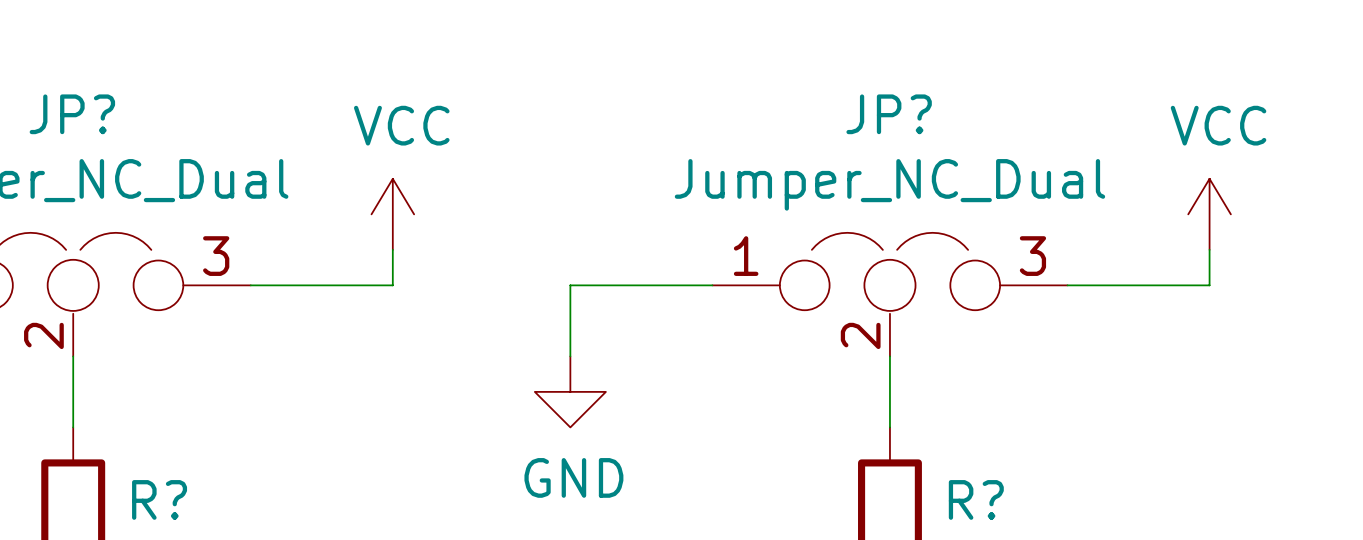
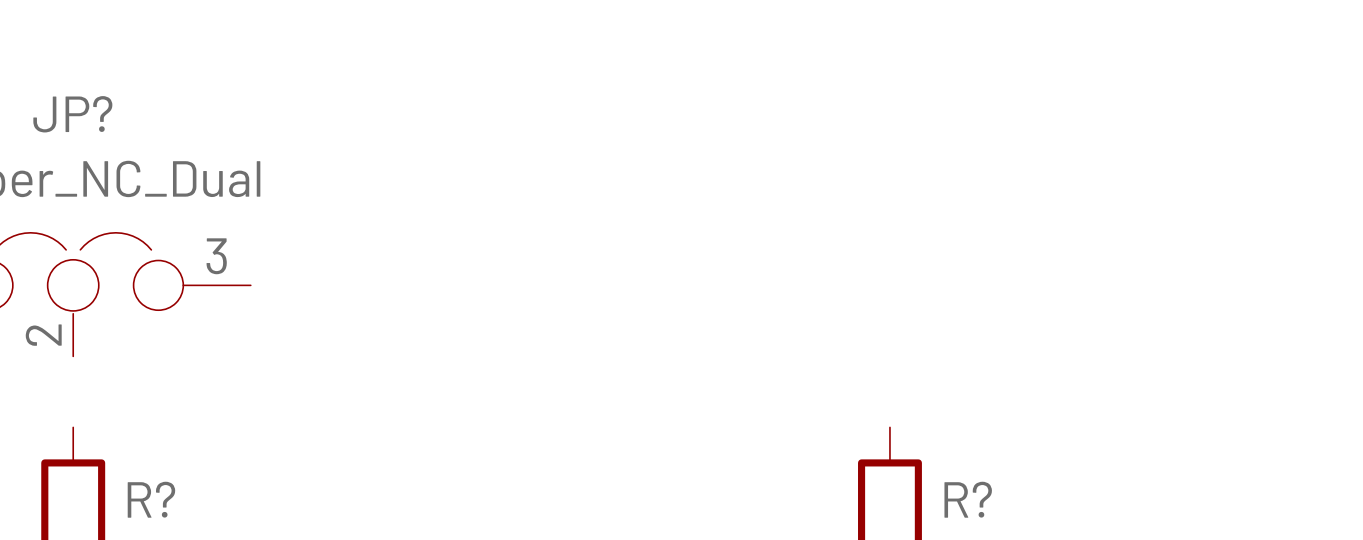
power symbol: VCC (392, 214) -> none
power symbol: VCC (1209, 214) -> none
wire: (392, 249) (392, 285) (250, 285) -> none
wire: (1209, 249) (1209, 285) (1067, 285) -> none
wire: (712, 285) (570, 285) (570, 356) -> none
JP?: Jumper_NC_Dual (889, 294) -> none
wire: (73, 356) (73, 427) -> none
wire: (889, 356) (889, 427) -> none
power symbol: GND (570, 391) -> none

